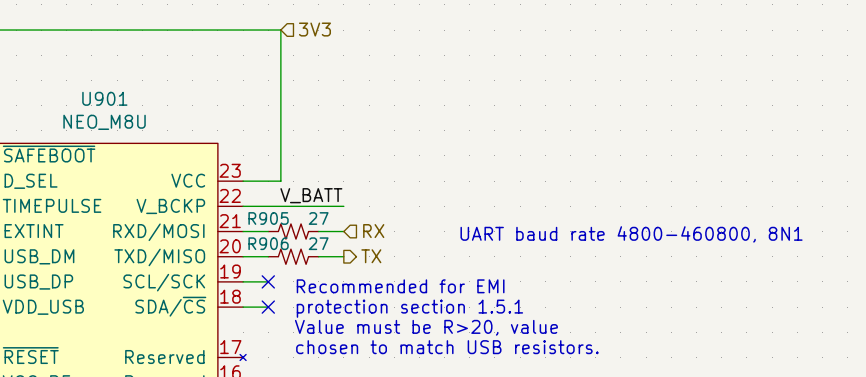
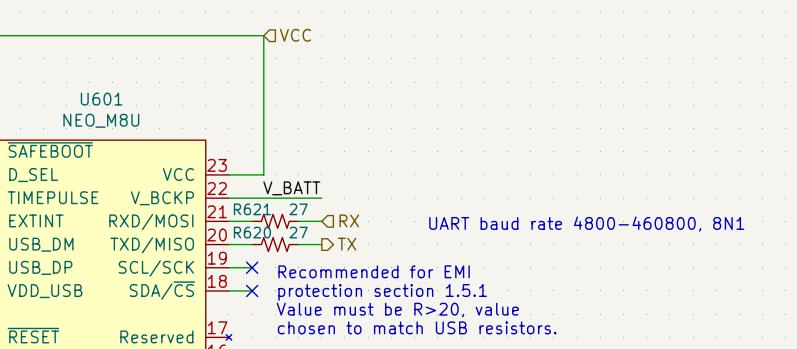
hierarchical label: 3V3 (314, 29) -> VCC (295, 35)
U901 name: U901 (104, 98) -> U601 (101, 99)
R905 name: R905 (268, 218) -> R621 (252, 209)
R906 name: R906 (268, 243) -> R620 (252, 232)

